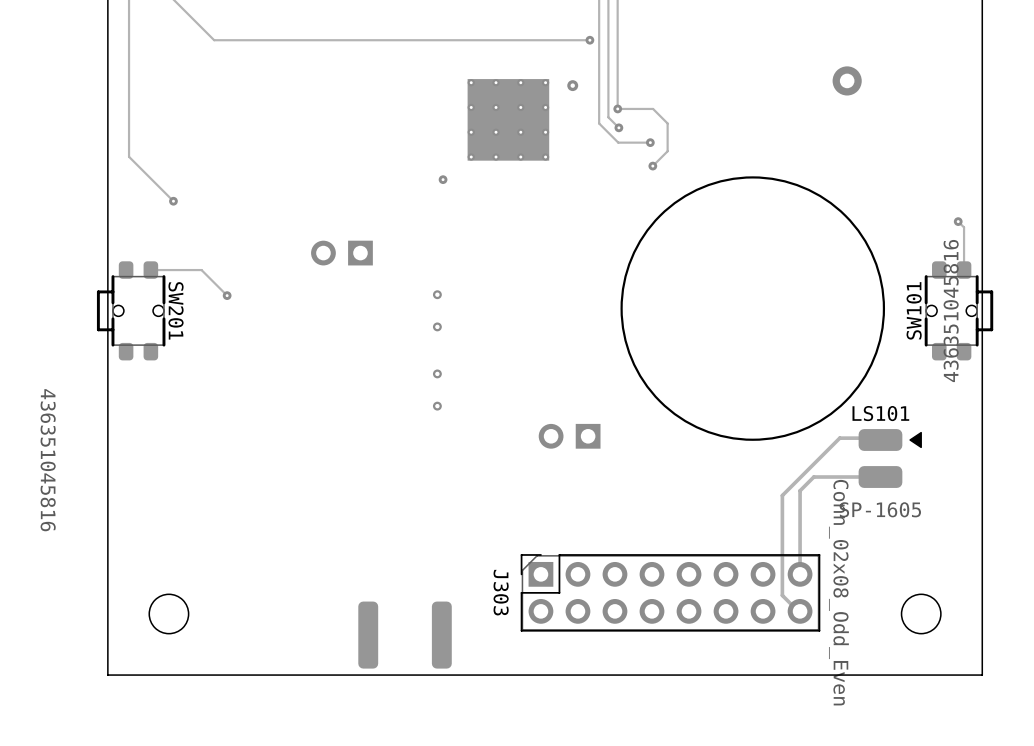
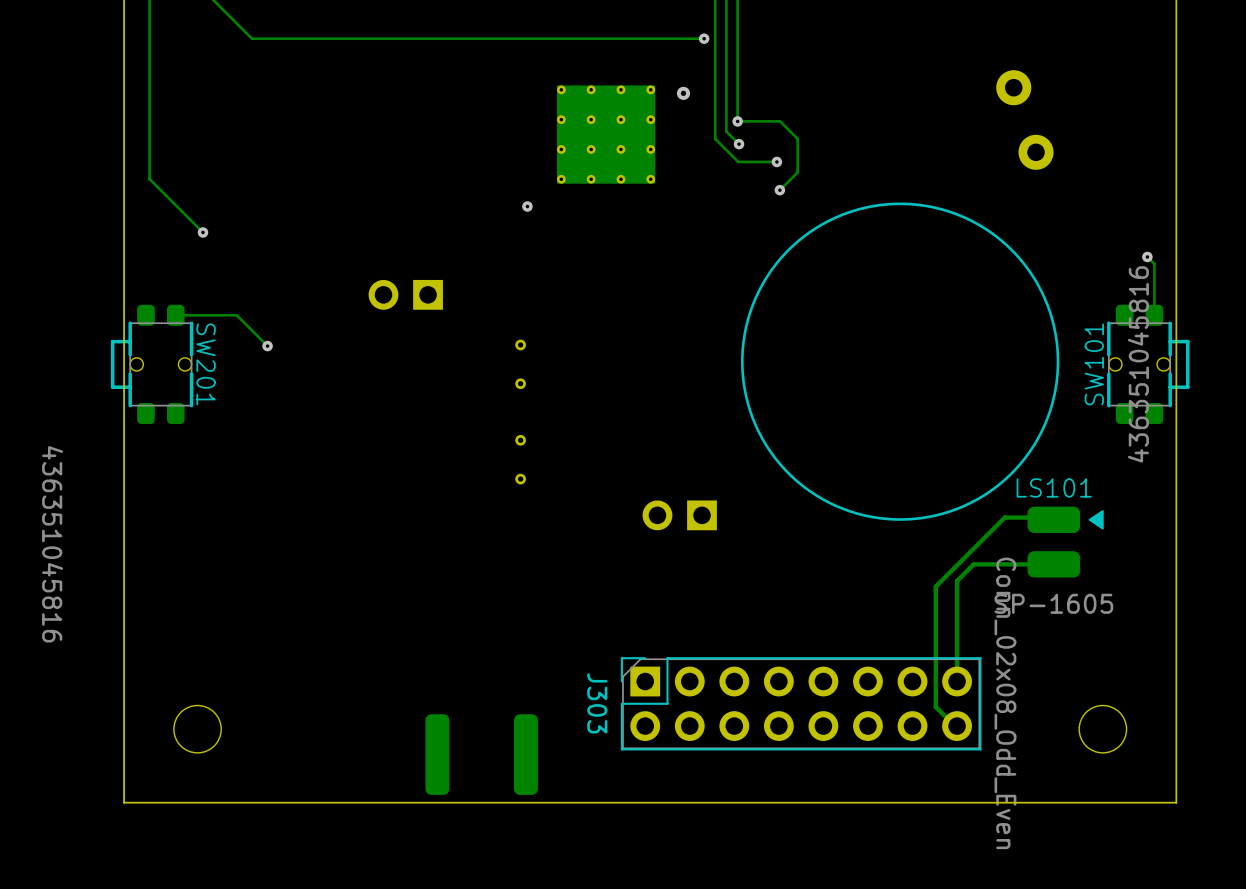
part: none -> (1036, 152)

